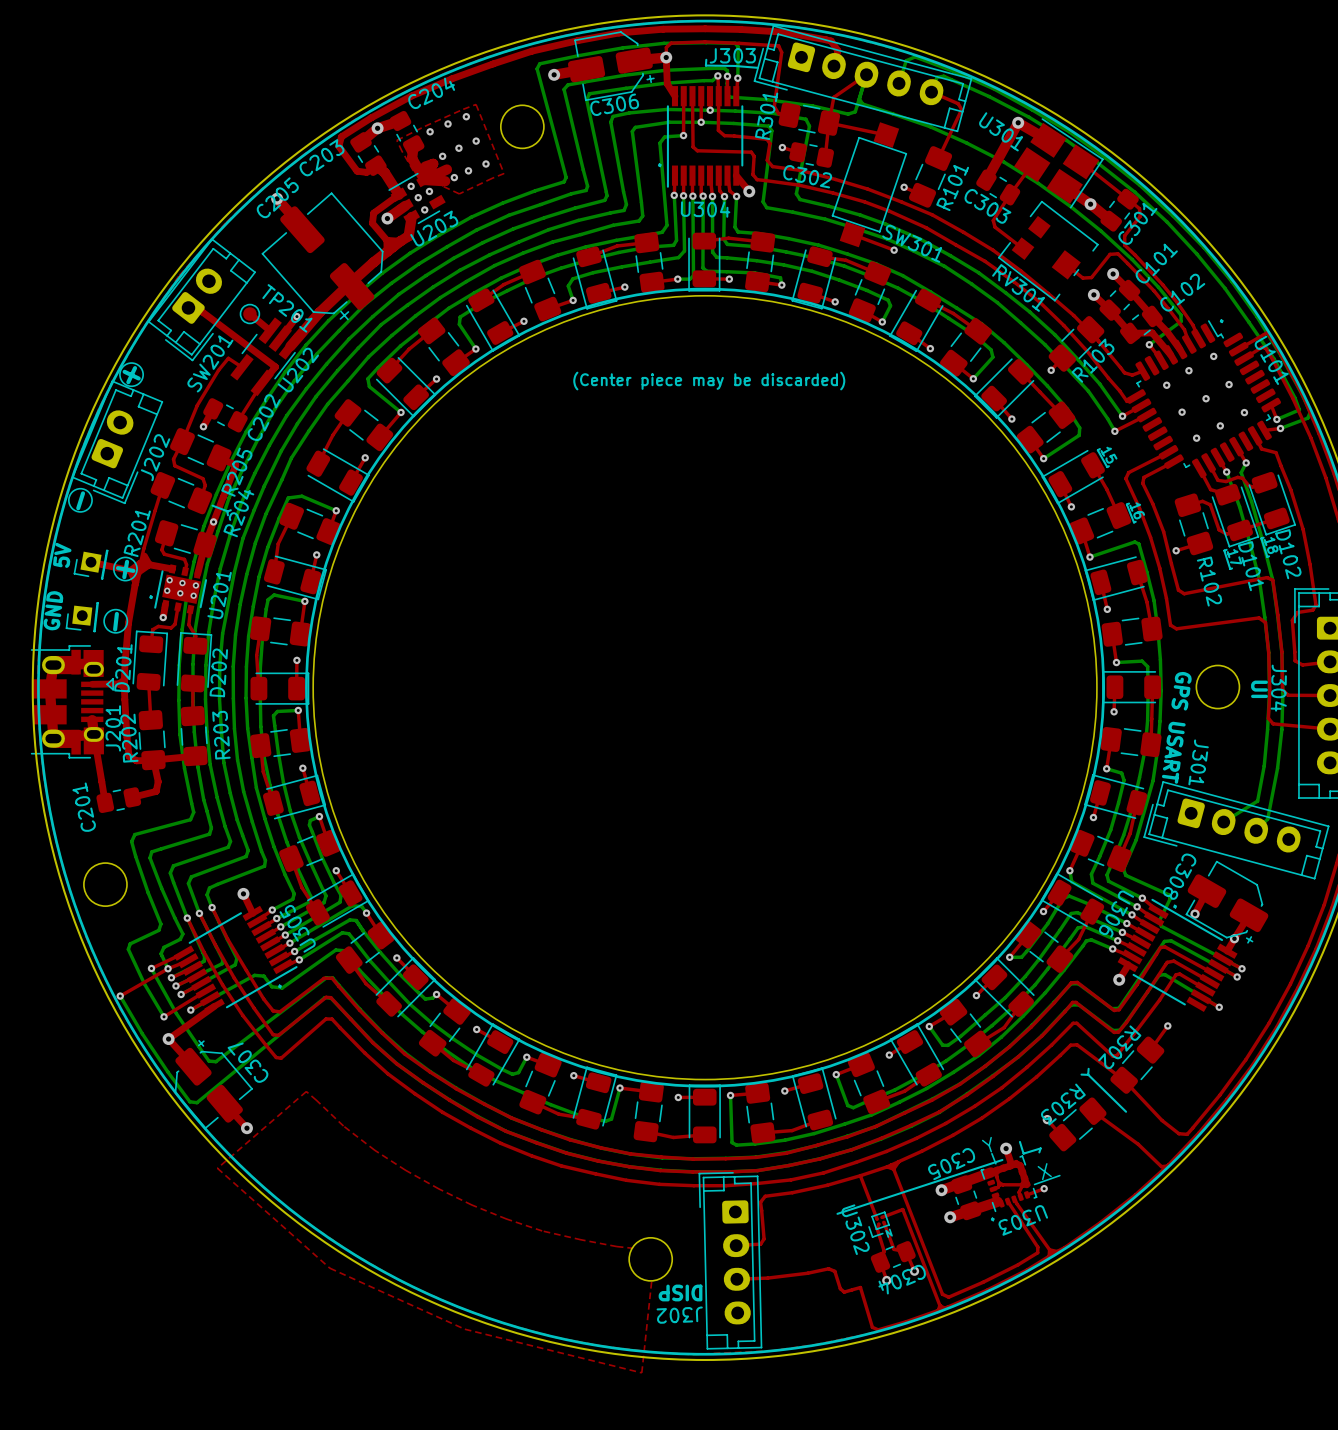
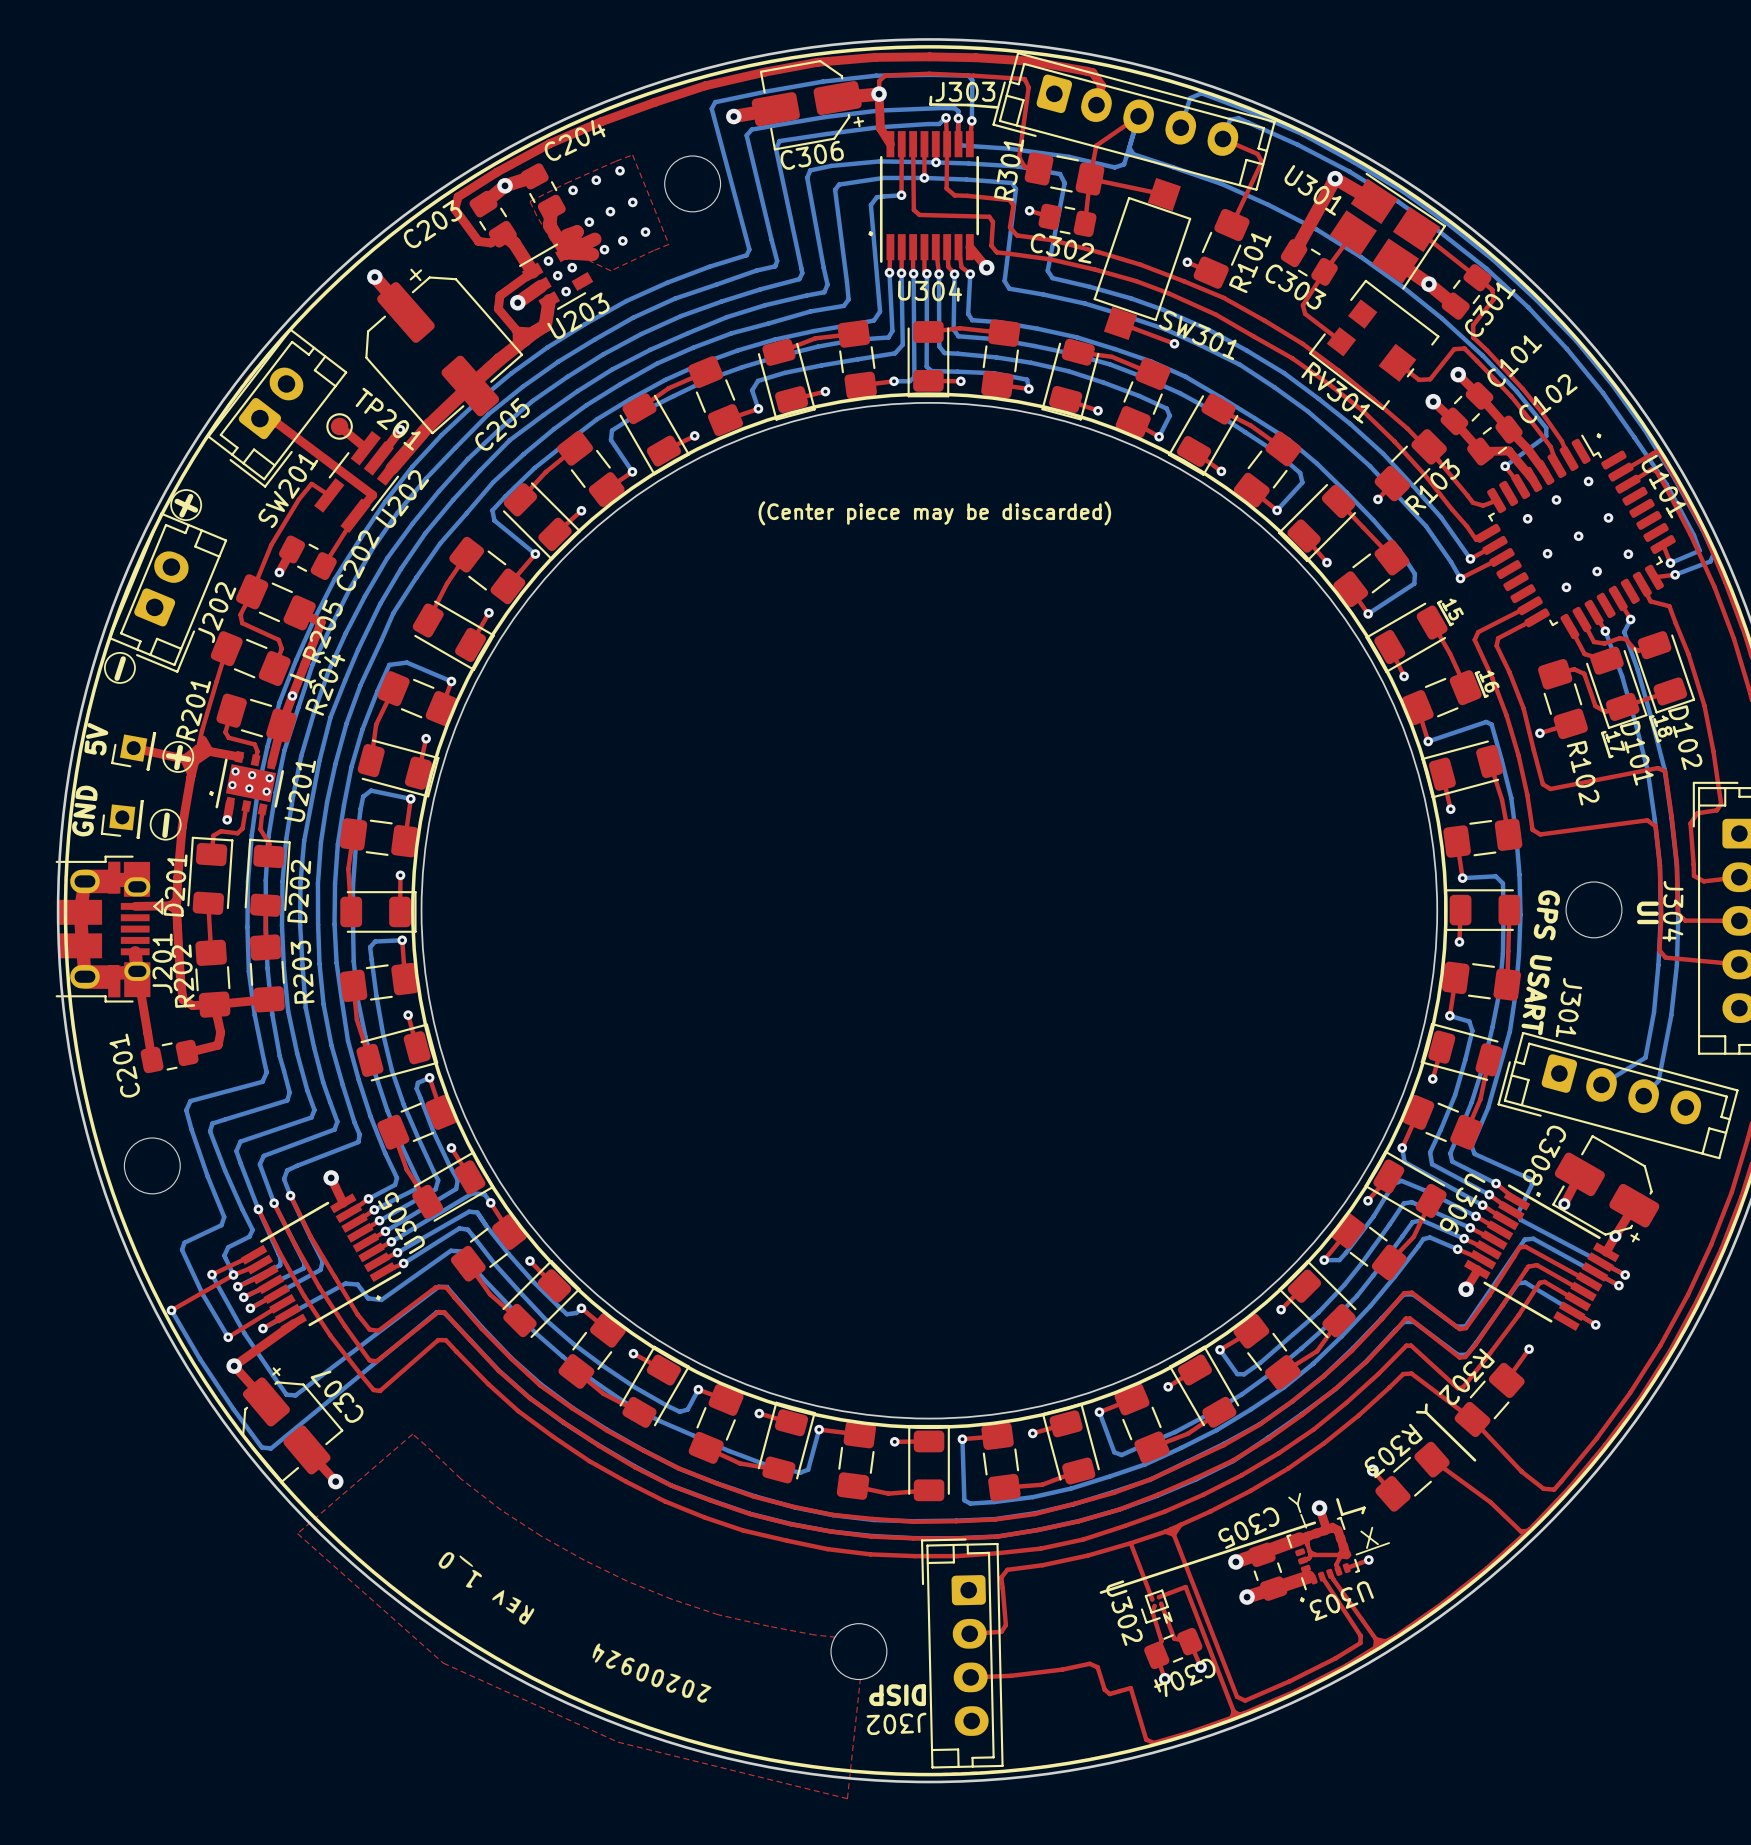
C205 rotation: 0° (322, 256) -> 180° (444, 351)
drawing: none -> [438, 1552, 712, 1703]

